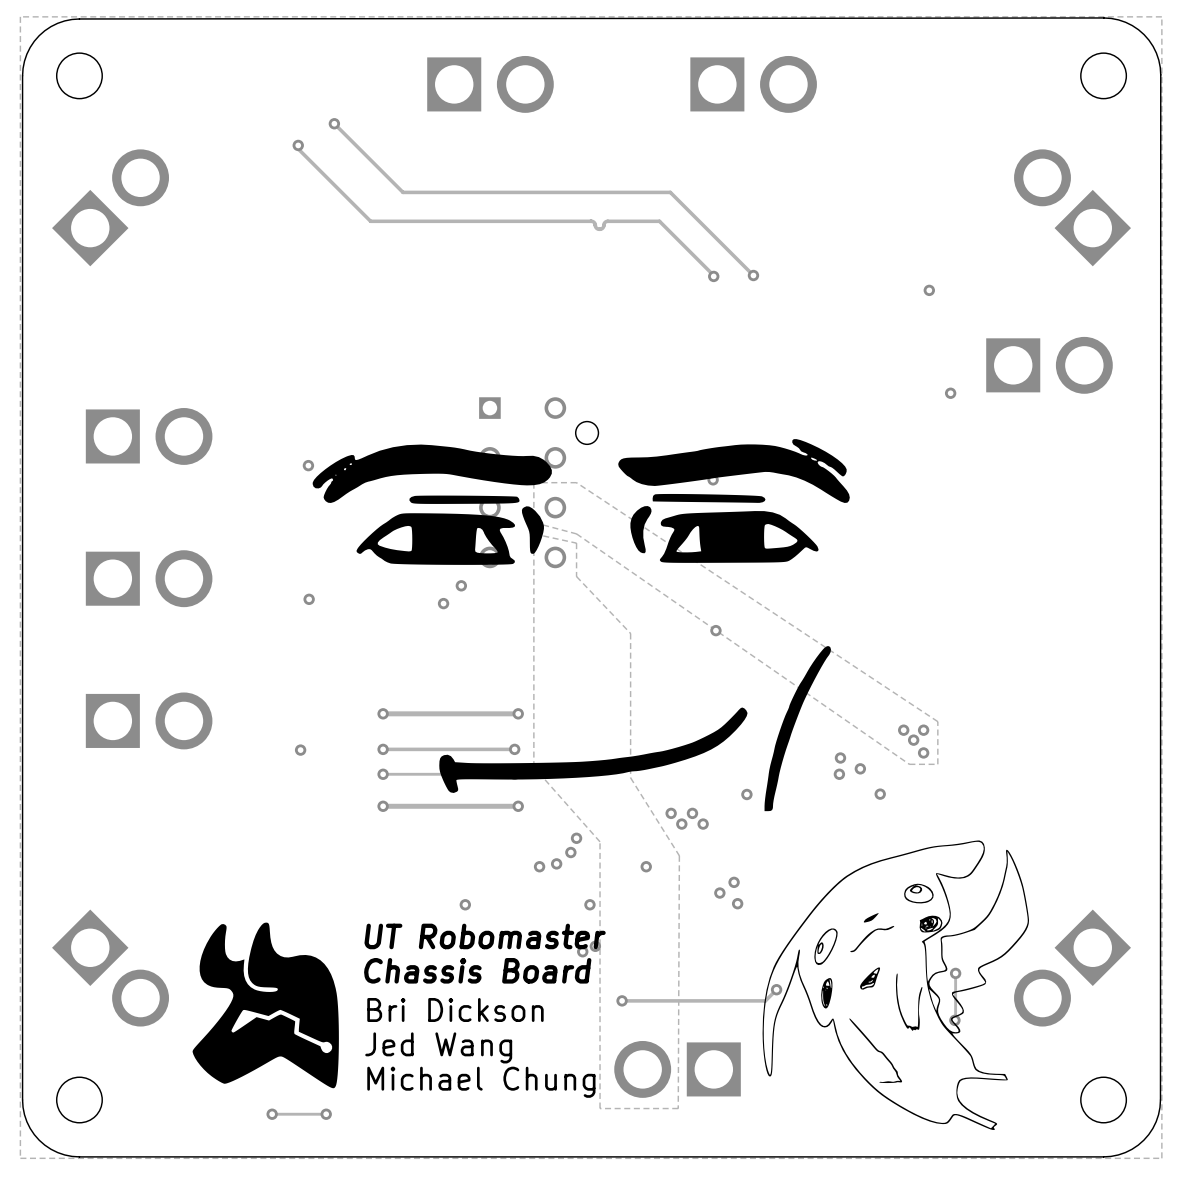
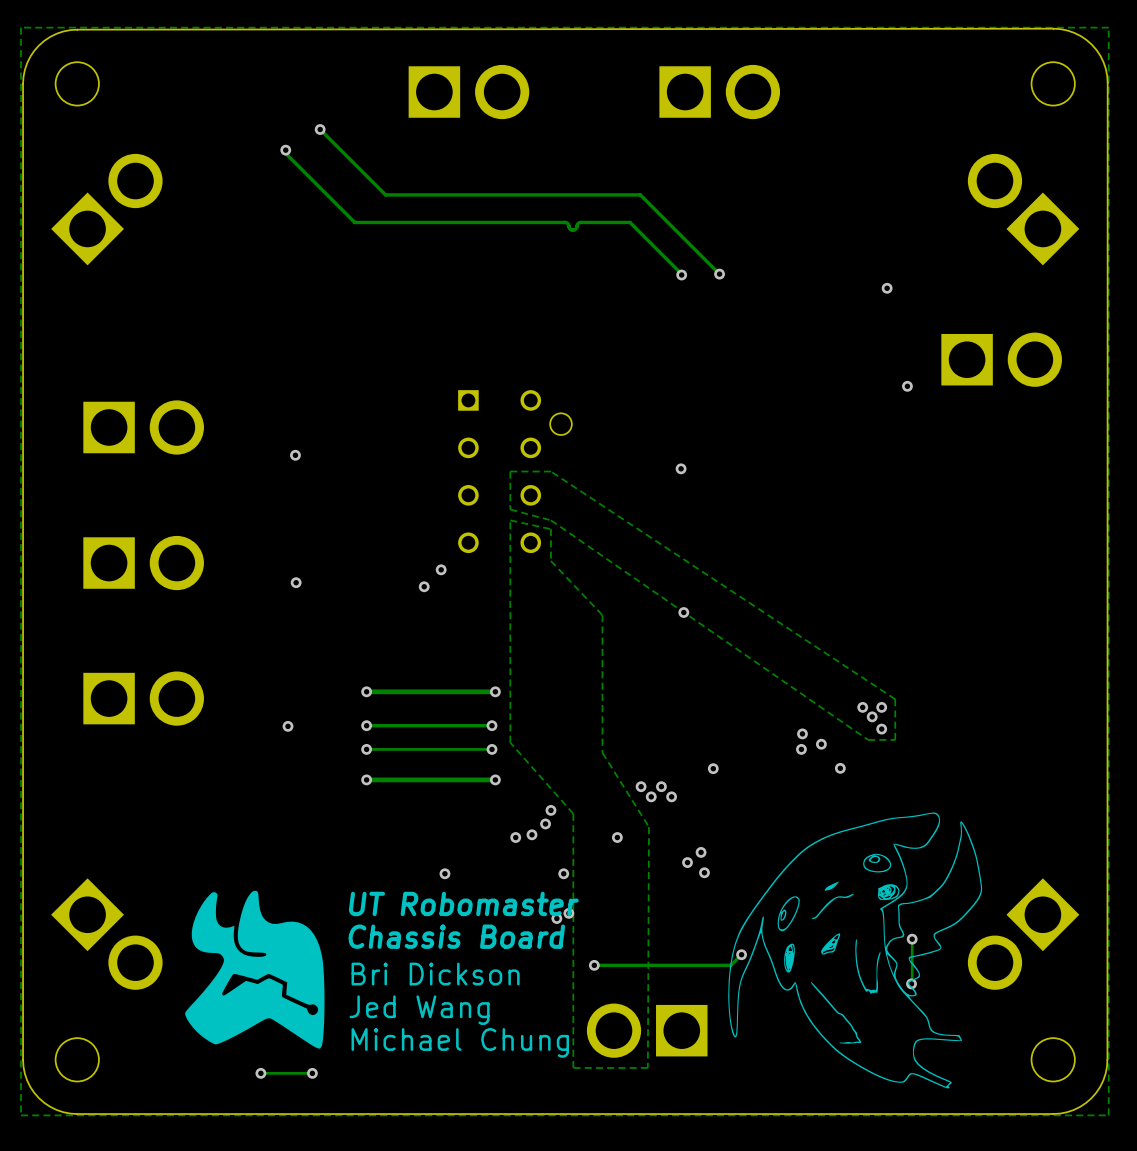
drawing: [312, 439, 850, 812] -> none

